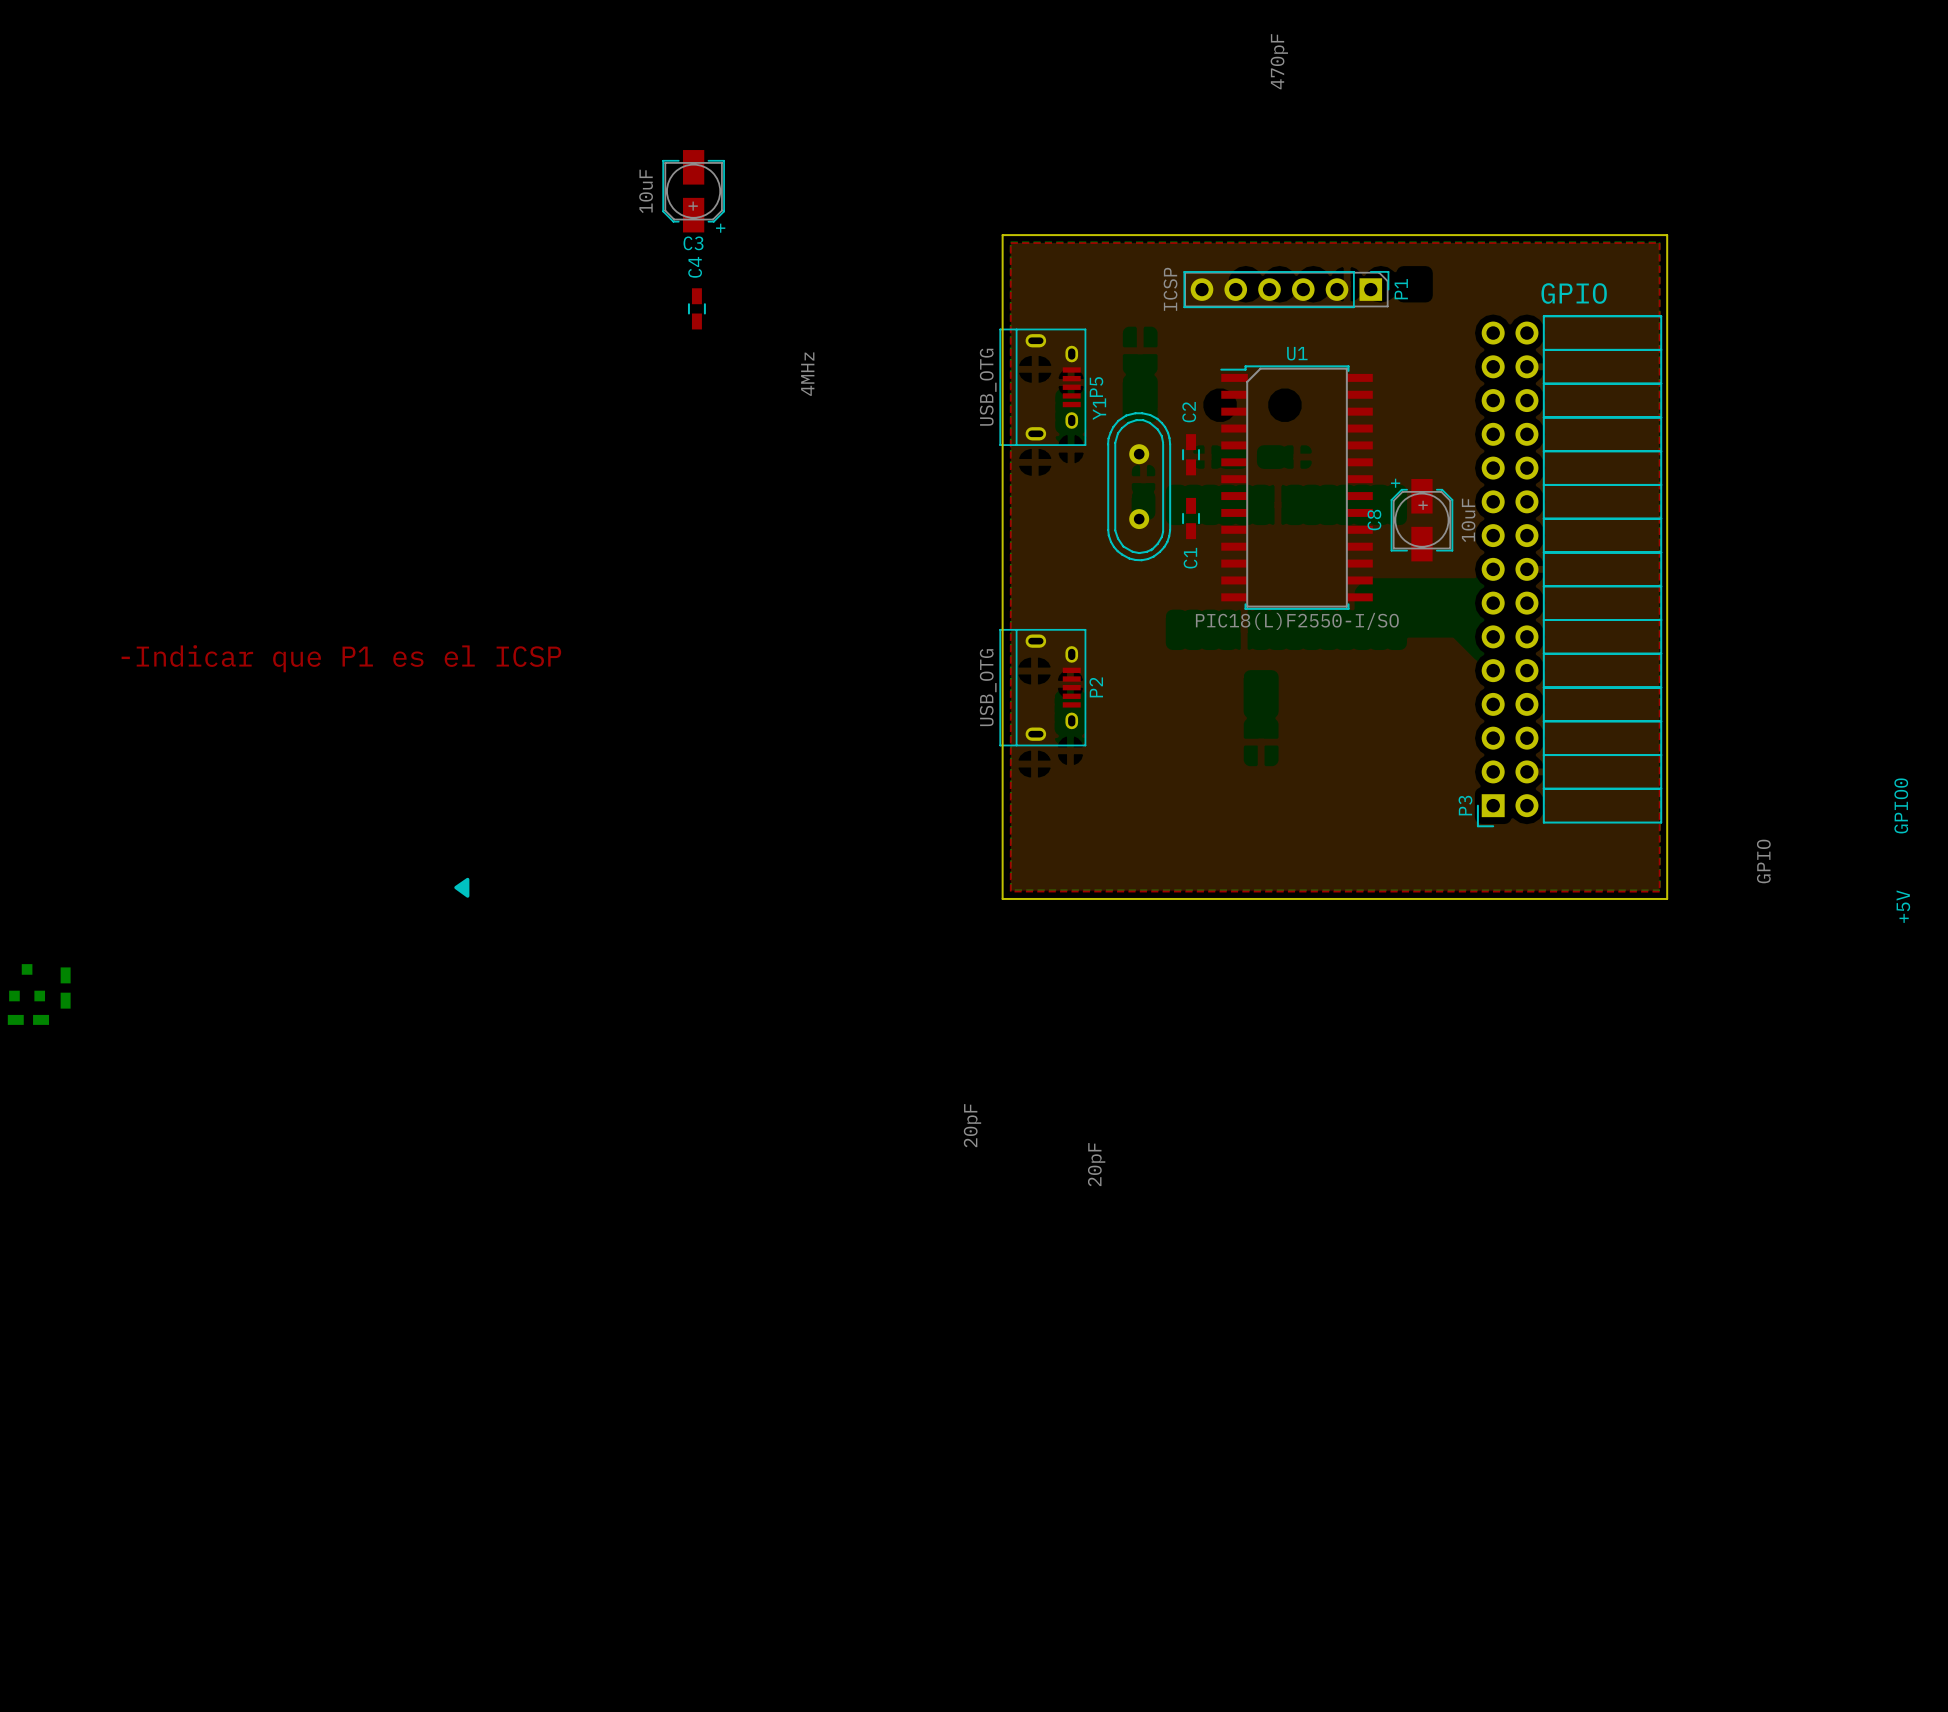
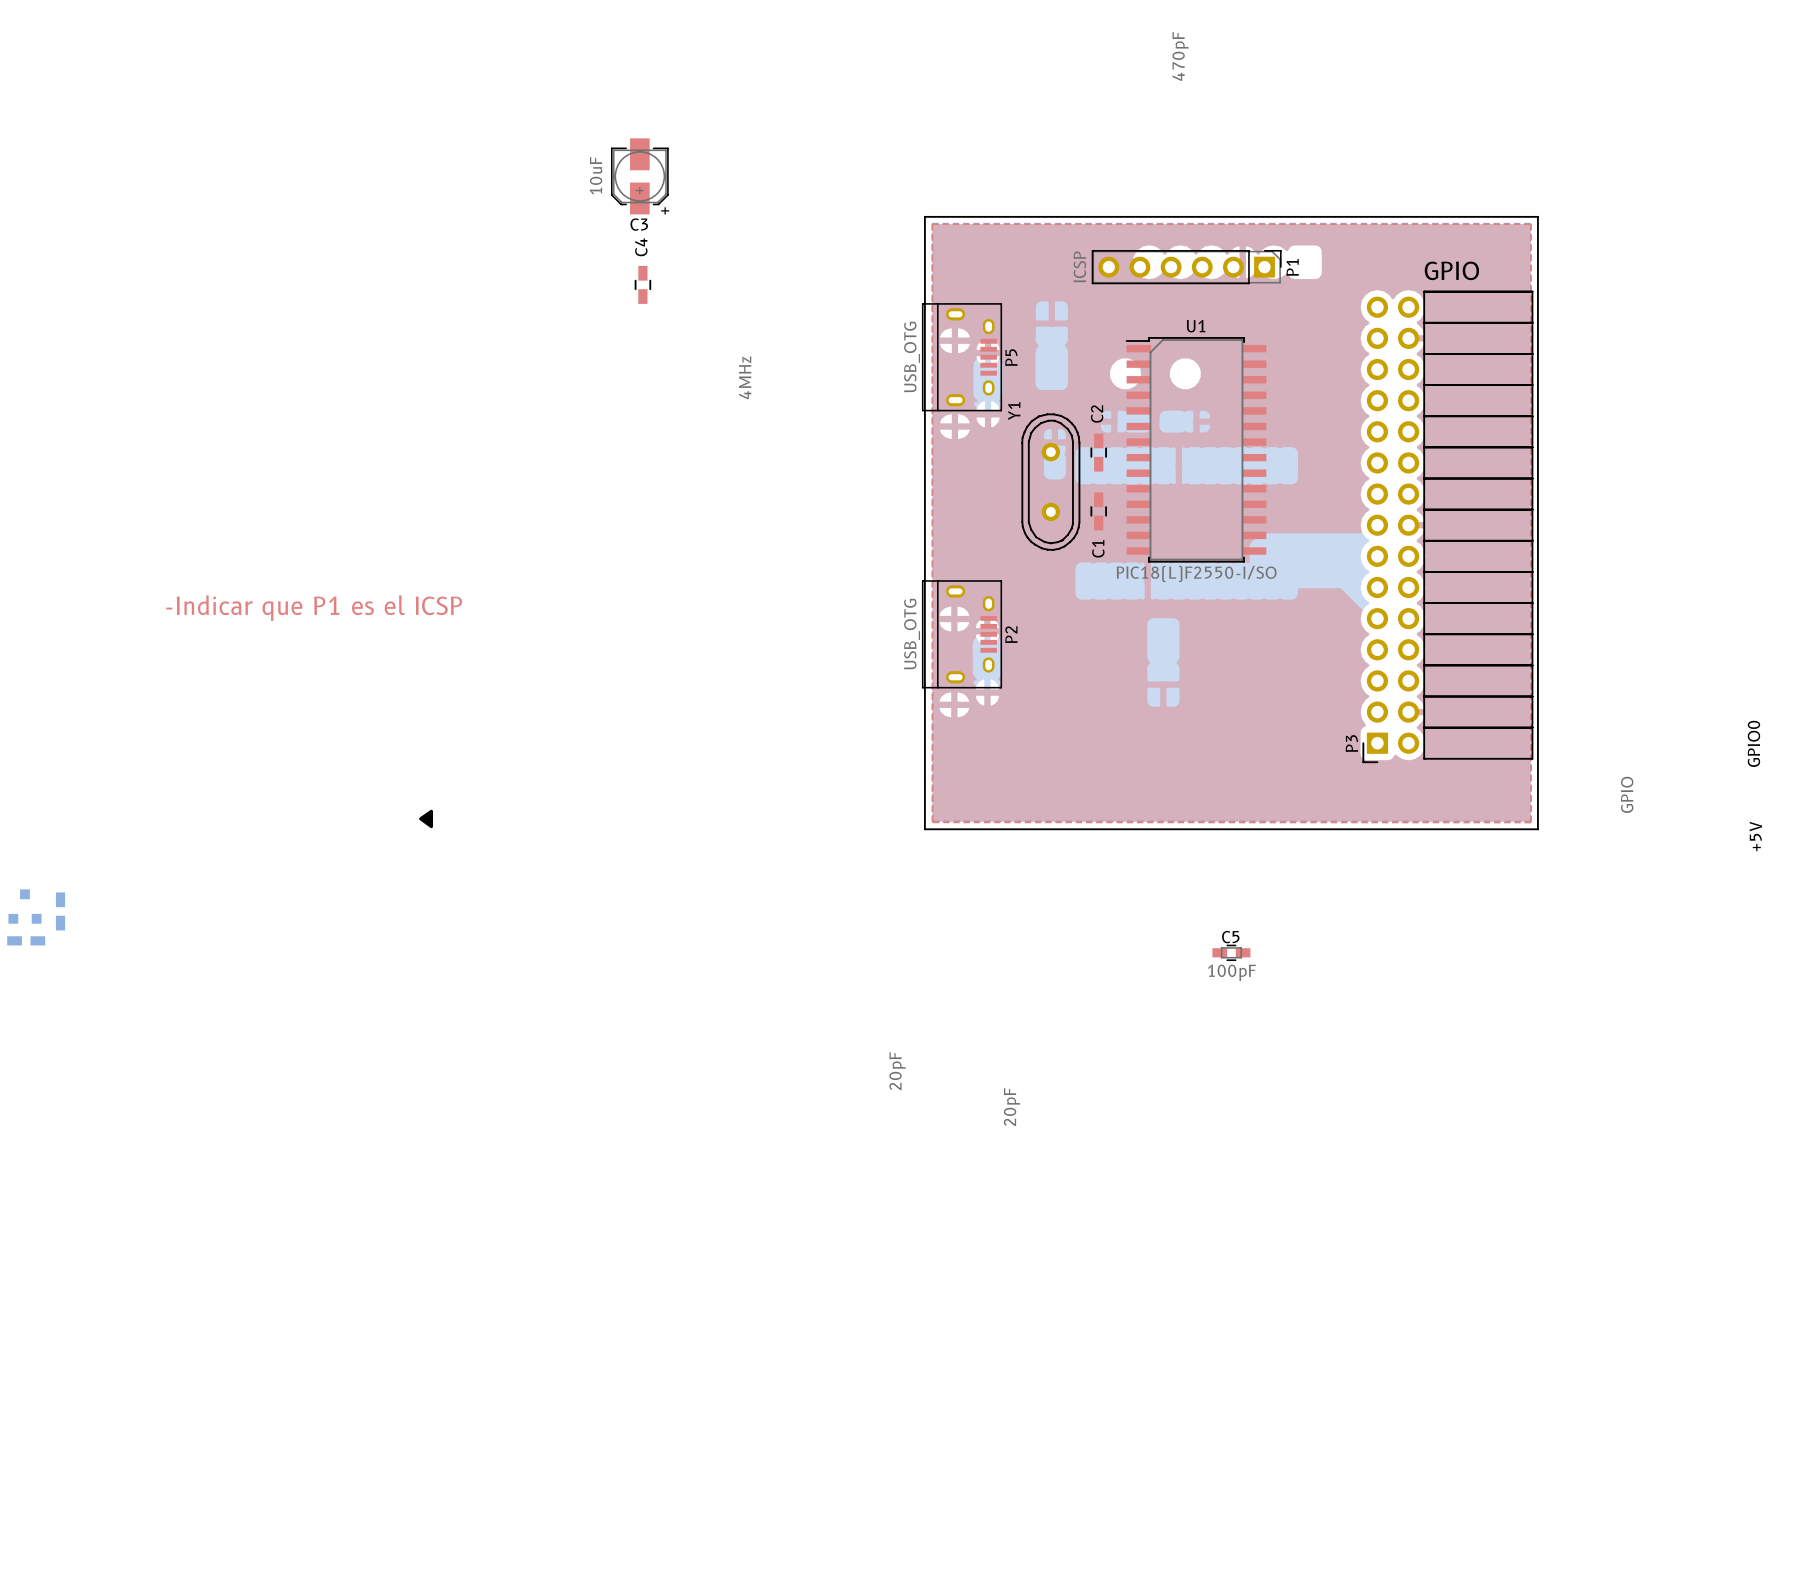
C2 position: (1191, 454) -> (1098, 452)
Y1 position: (1139, 486) -> (1050, 482)
C1 position: (1191, 518) -> (1098, 511)
C8: 10uF (1421, 520) -> none
C5: none -> 100pF (1231, 952)

